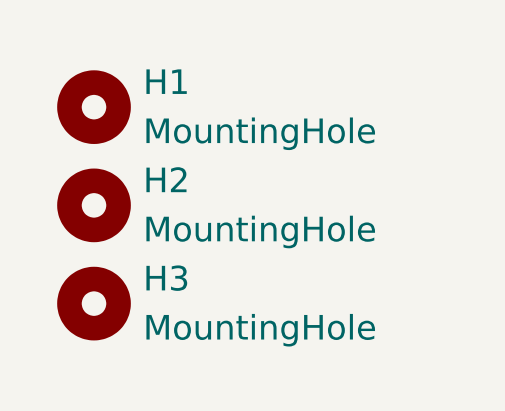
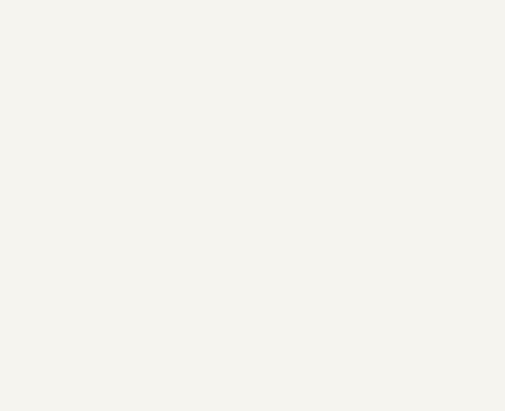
H1: MountingHole (94, 107) -> none
H2: MountingHole (94, 205) -> none
H3: MountingHole (94, 303) -> none

